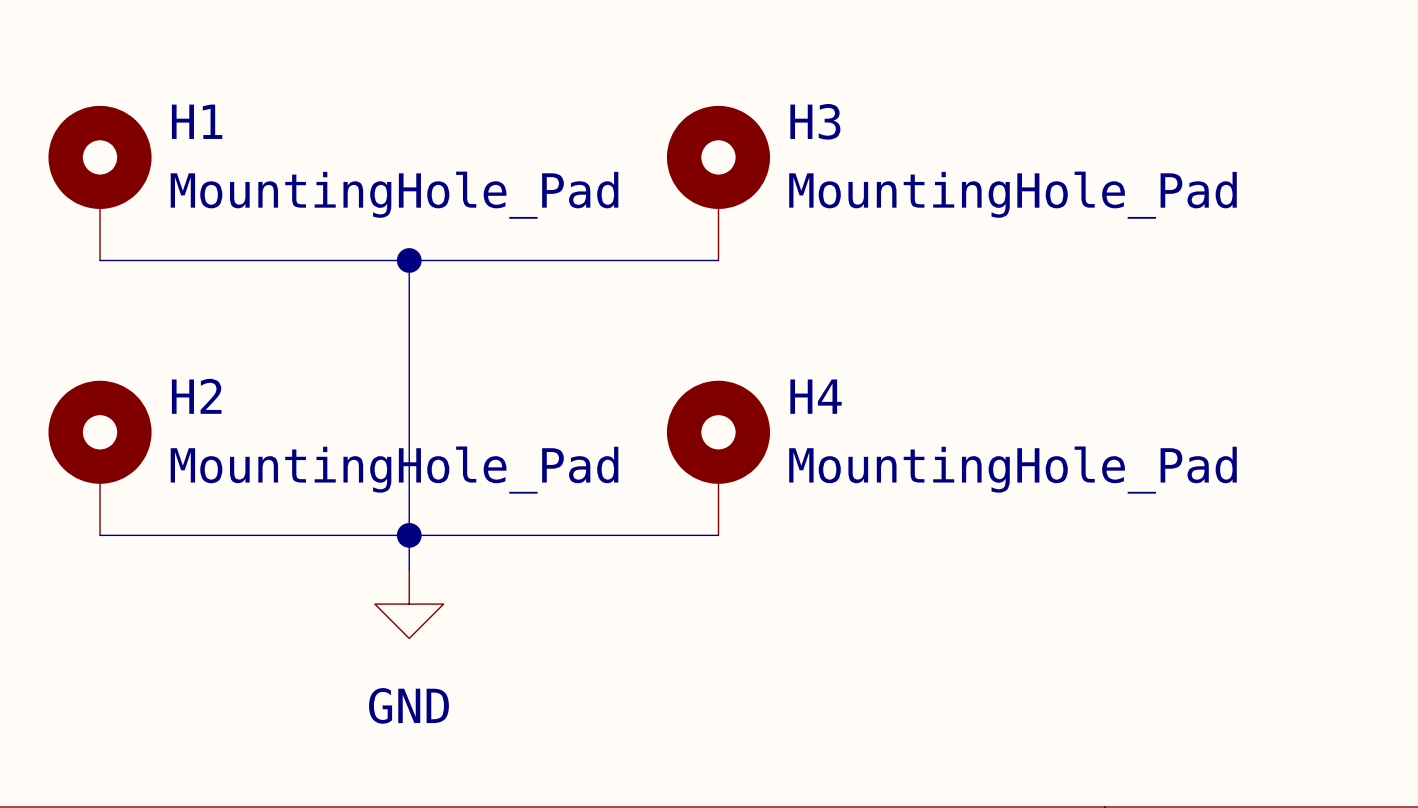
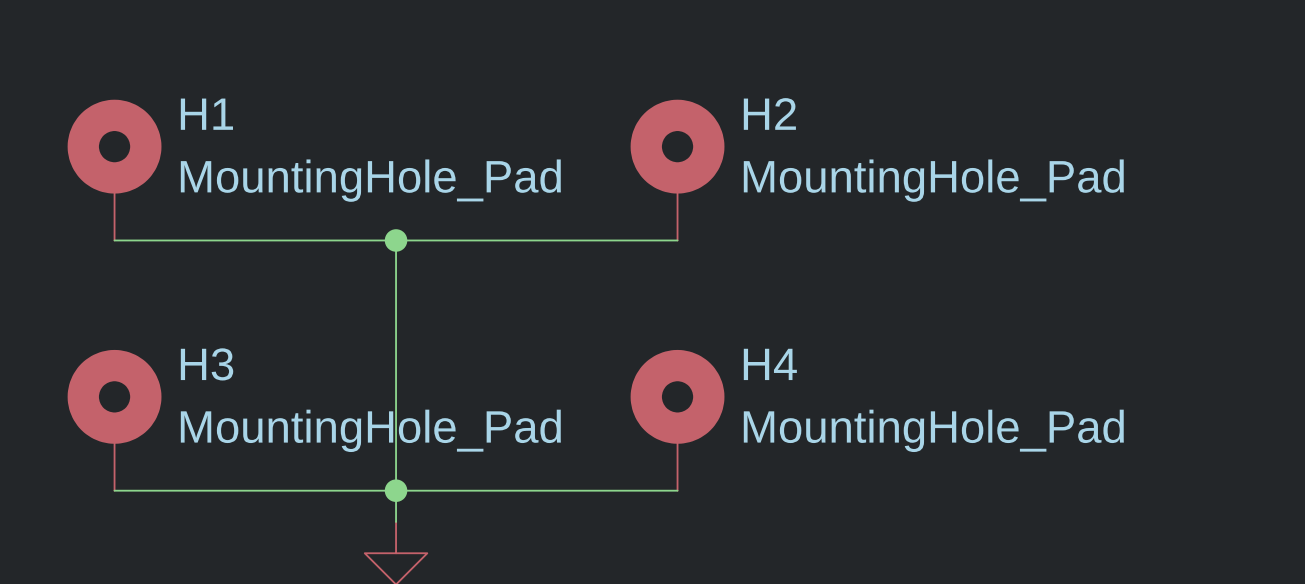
H3 name: H3 (815, 121) -> H2 (769, 113)
H2 name: H2 (196, 396) -> H3 (207, 364)

